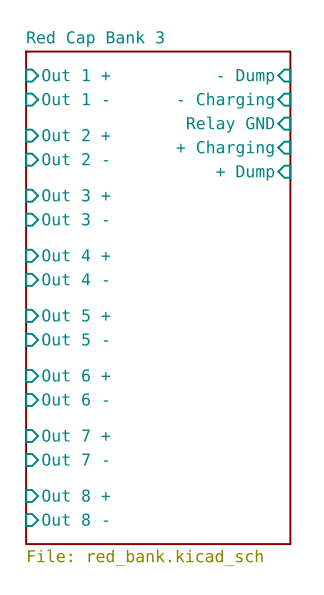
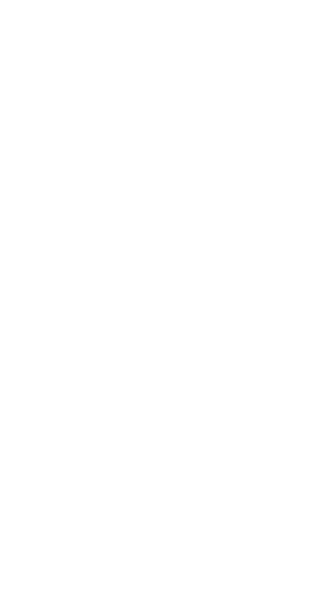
sheet pin: Out 1 + (76, 75) -> none
sheet pin: - Dump (246, 76) -> none
sheet pin: Out 1 - (75, 99) -> none
sheet pin: - Charging (226, 100) -> none
sheet pin: Relay GND (230, 124) -> none
sheet pin: Out 2 + (76, 135) -> none
sheet pin: + Charging (225, 148) -> none
sheet pin: Out 2 - (75, 159) -> none
sheet pin: + Dump (245, 172) -> none
sheet pin: Out 3 + (76, 195) -> none
sheet pin: Out 3 - (75, 219) -> none
sheet pin: Out 4 + (76, 255) -> none
sheet pin: Out 4 - (75, 279) -> none
sheet Red Cap Bank 3: File: red_bank.kicad_sch (158, 297) -> none
sheet pin: Out 5 + (76, 315) -> none
sheet pin: Out 5 - (75, 339) -> none
sheet pin: Out 6 + (76, 375) -> none
sheet pin: Out 6 - (75, 399) -> none
sheet pin: Out 7 + (76, 435) -> none
sheet pin: Out 7 - (75, 459) -> none
sheet pin: Out 8 + (76, 495) -> none
sheet pin: Out 8 - (75, 519) -> none

